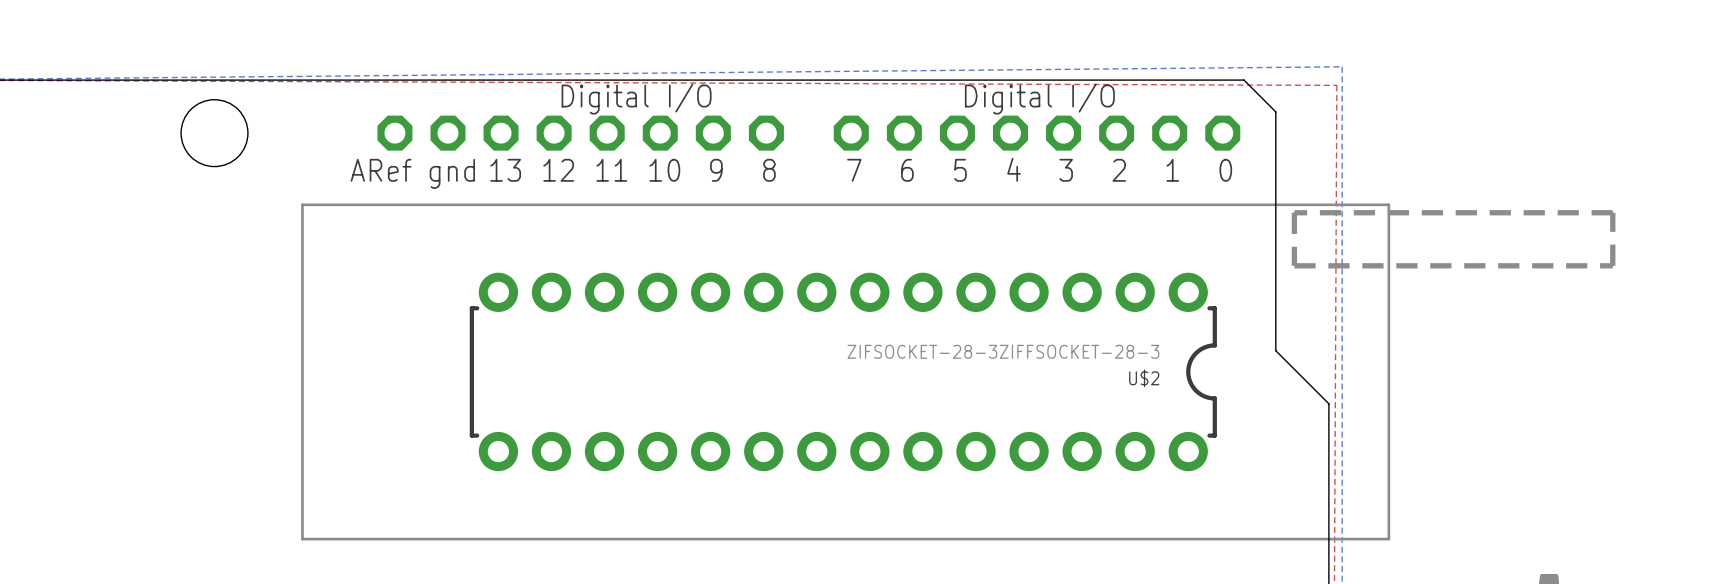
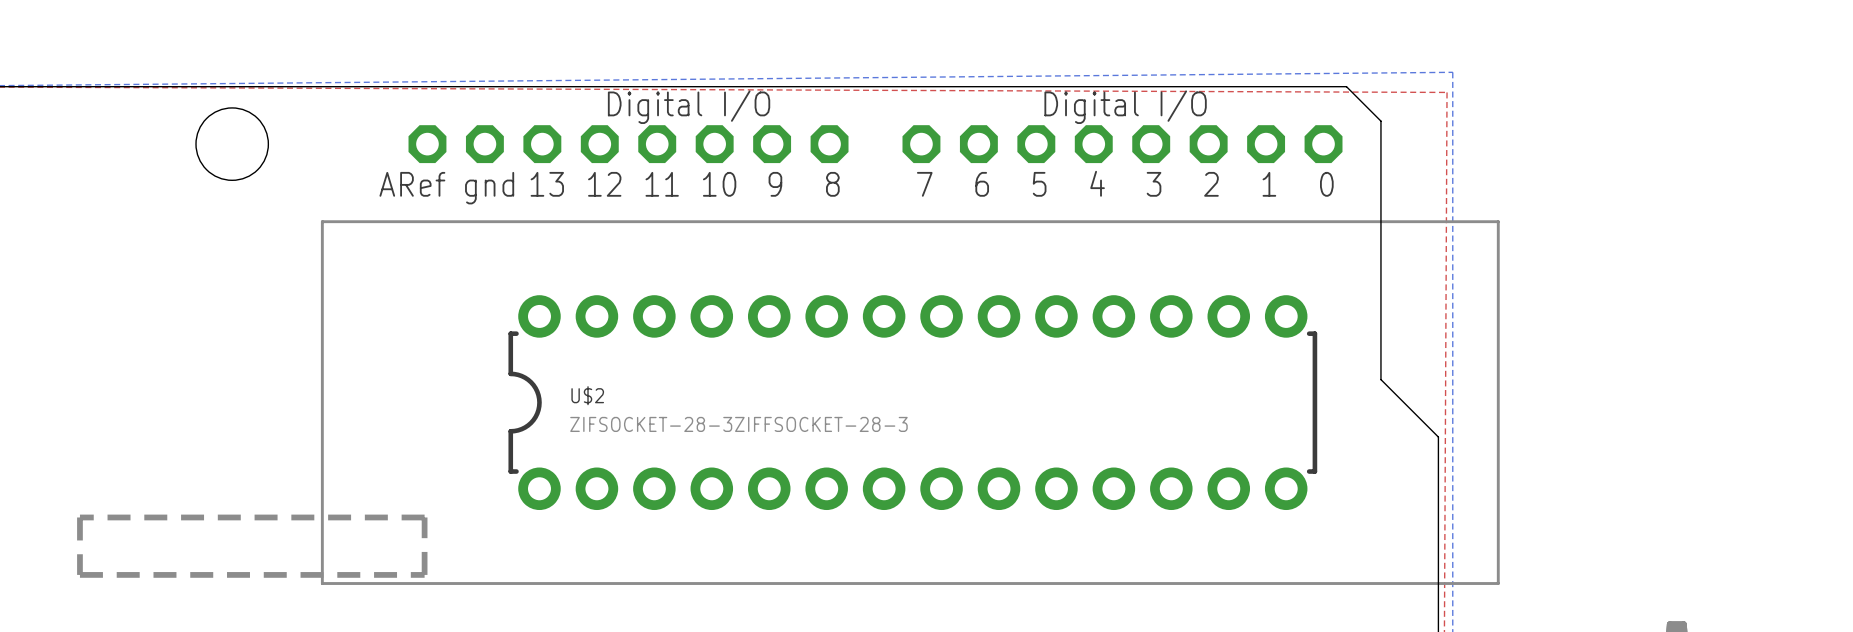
U$2 rotation: 0° (958, 371) -> 180° (788, 402)

